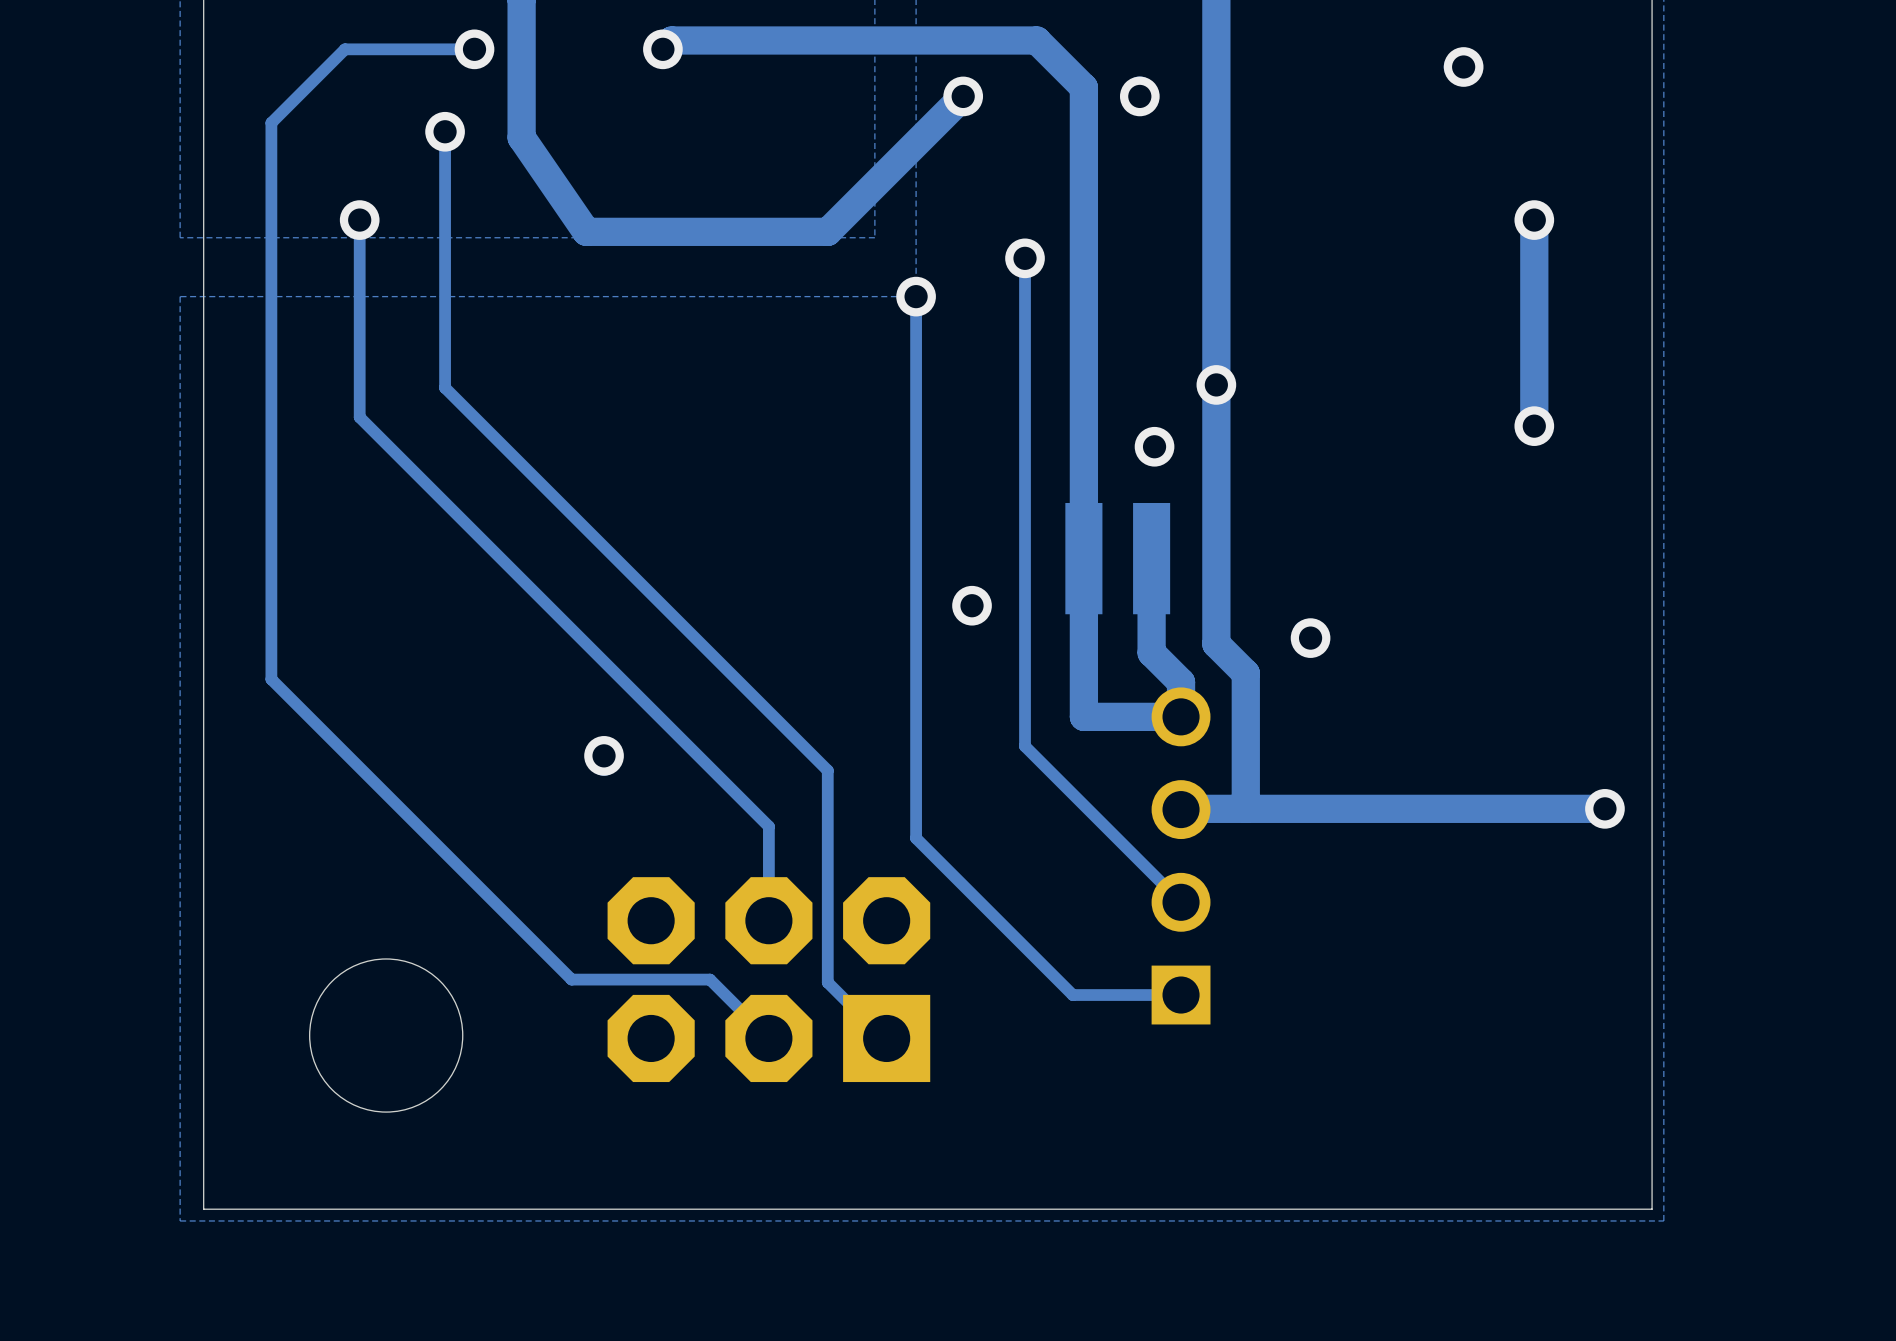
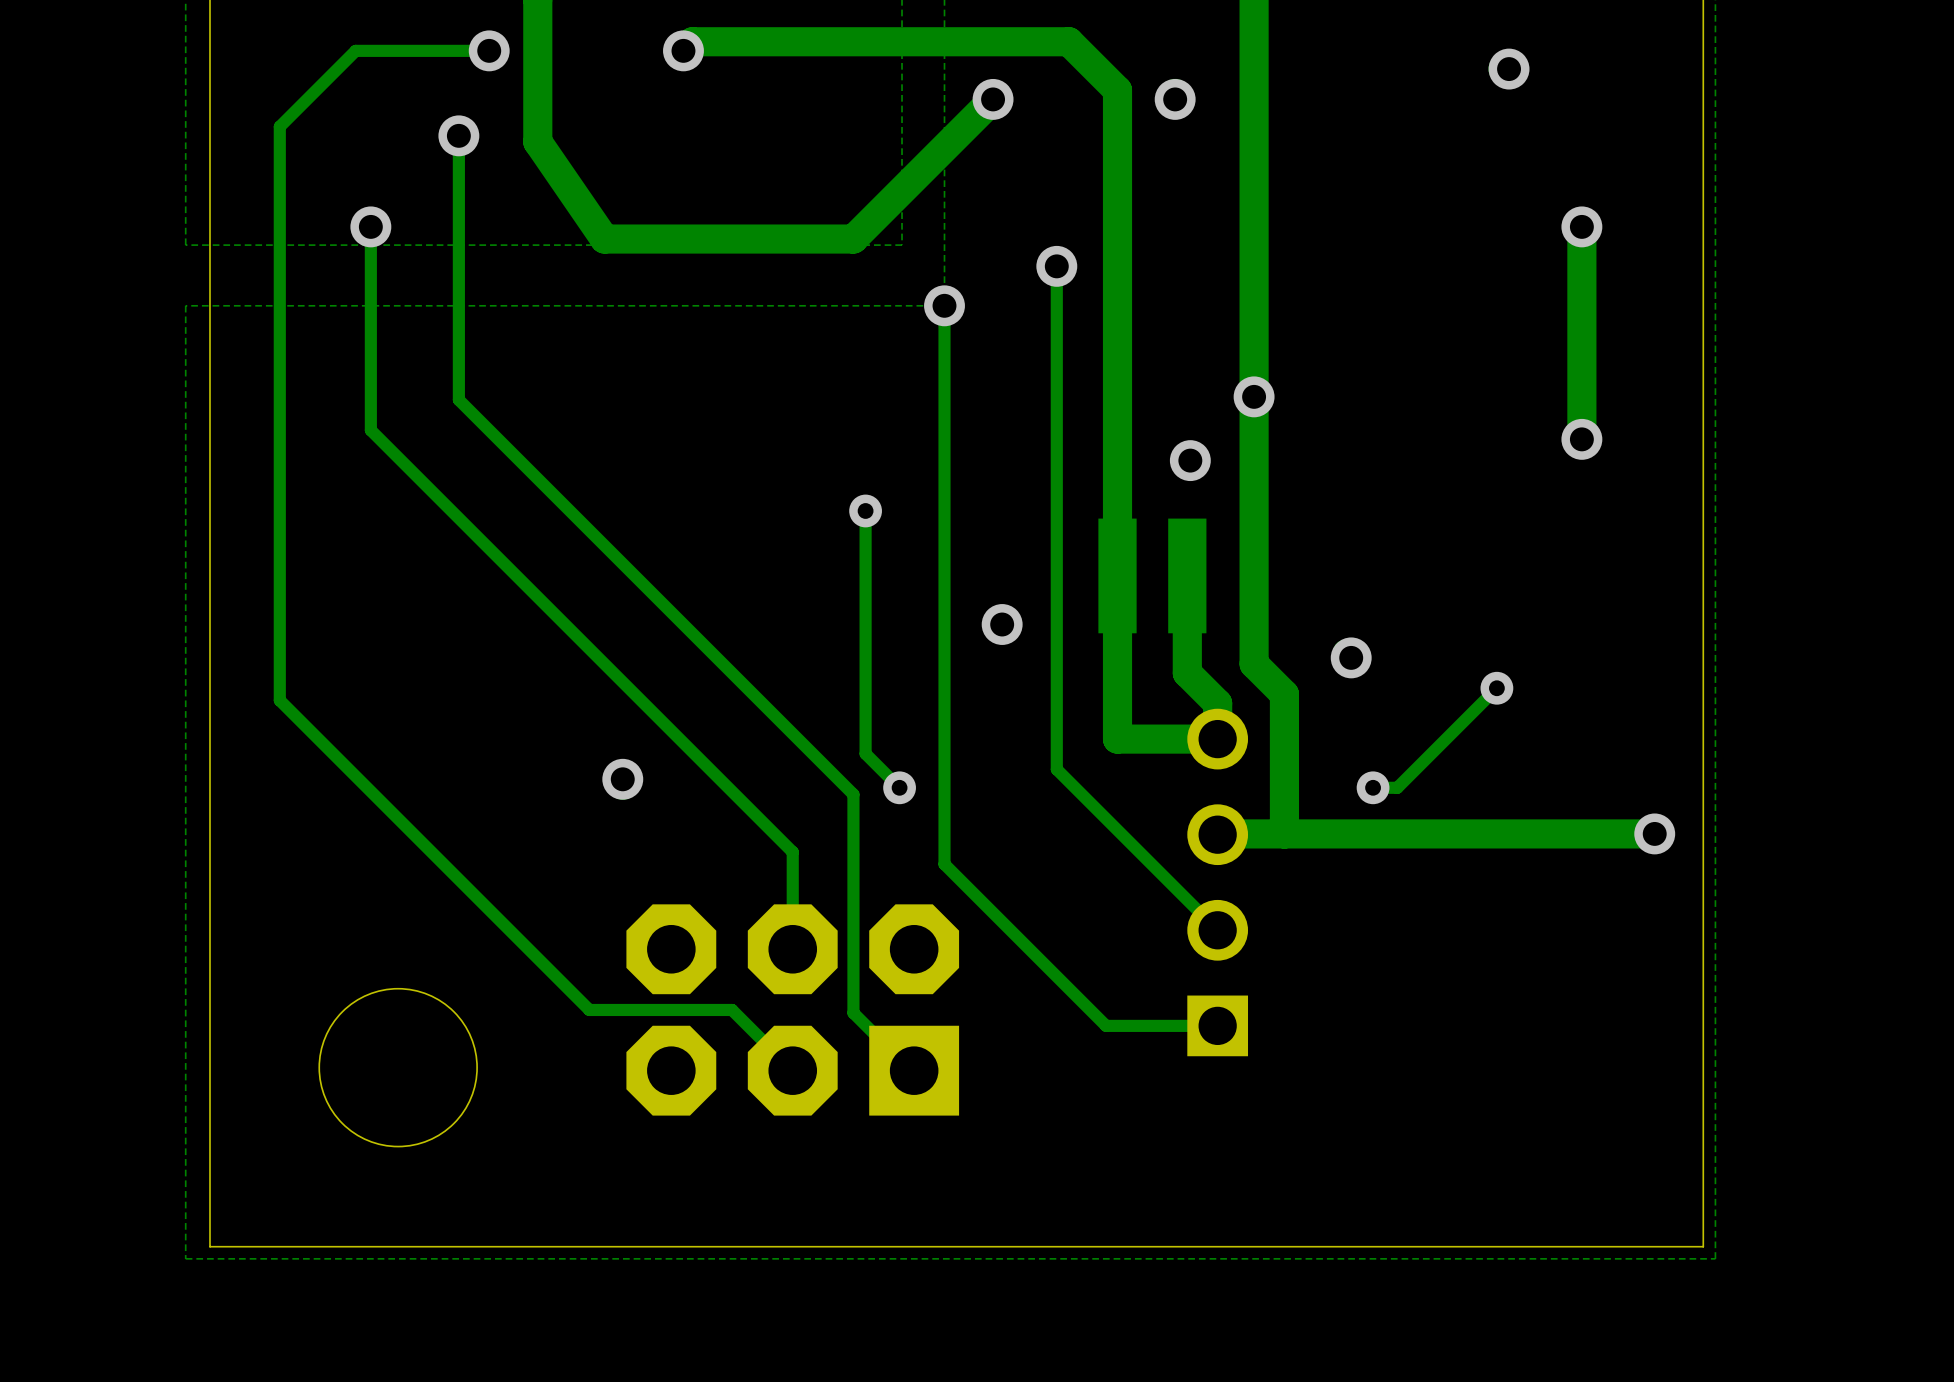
track: none -> (865, 510) (865, 753) (899, 787)
via: none -> (865, 510)
track: none -> (1496, 688) (1397, 787) (1373, 787)
via: none -> (1496, 688)
via: none -> (899, 787)
via: none -> (1373, 787)

